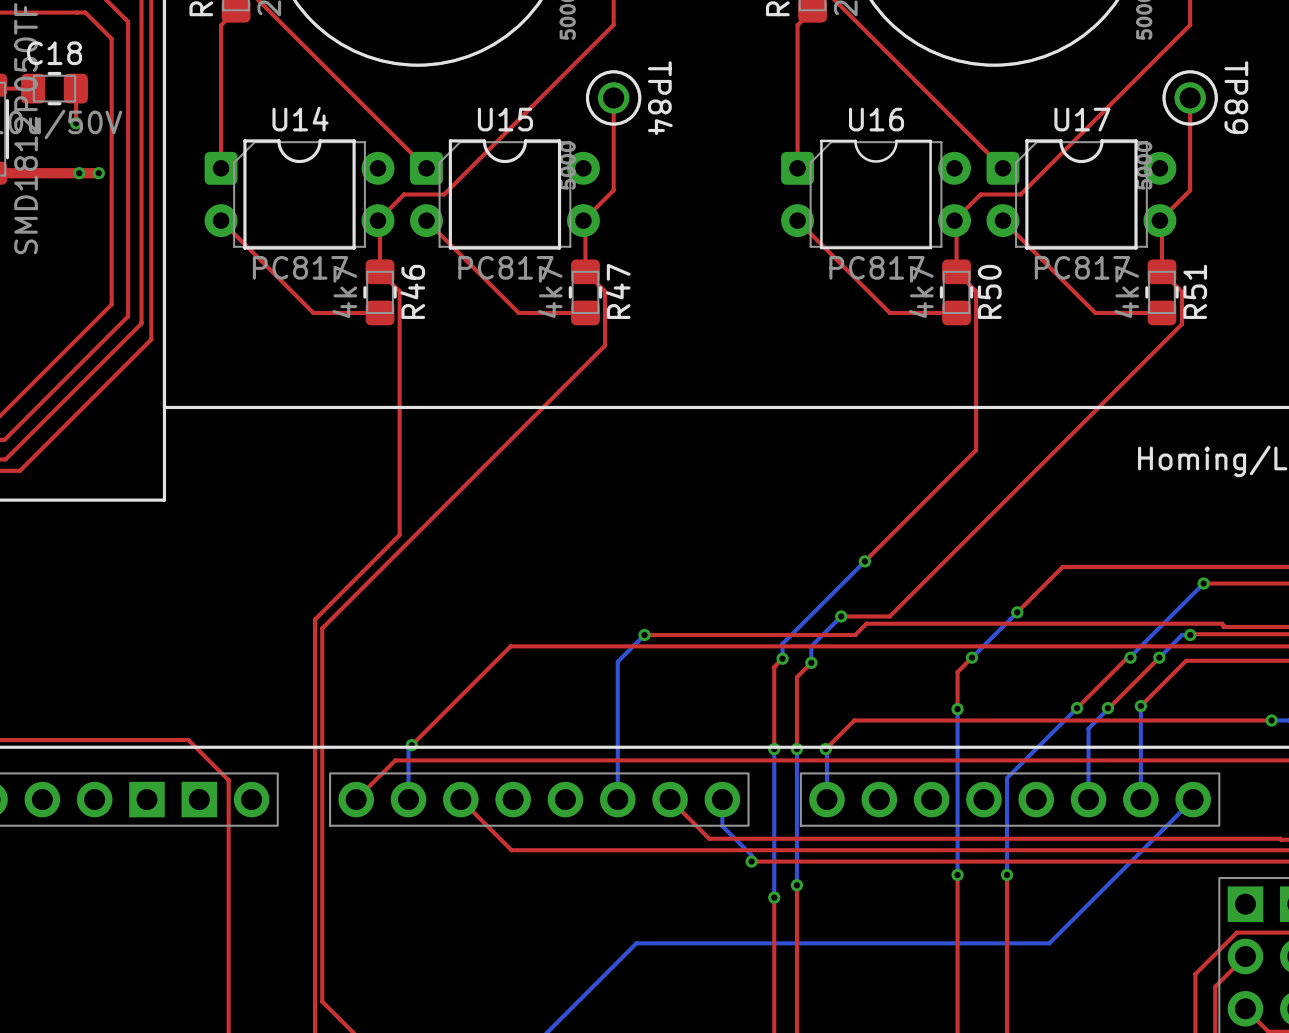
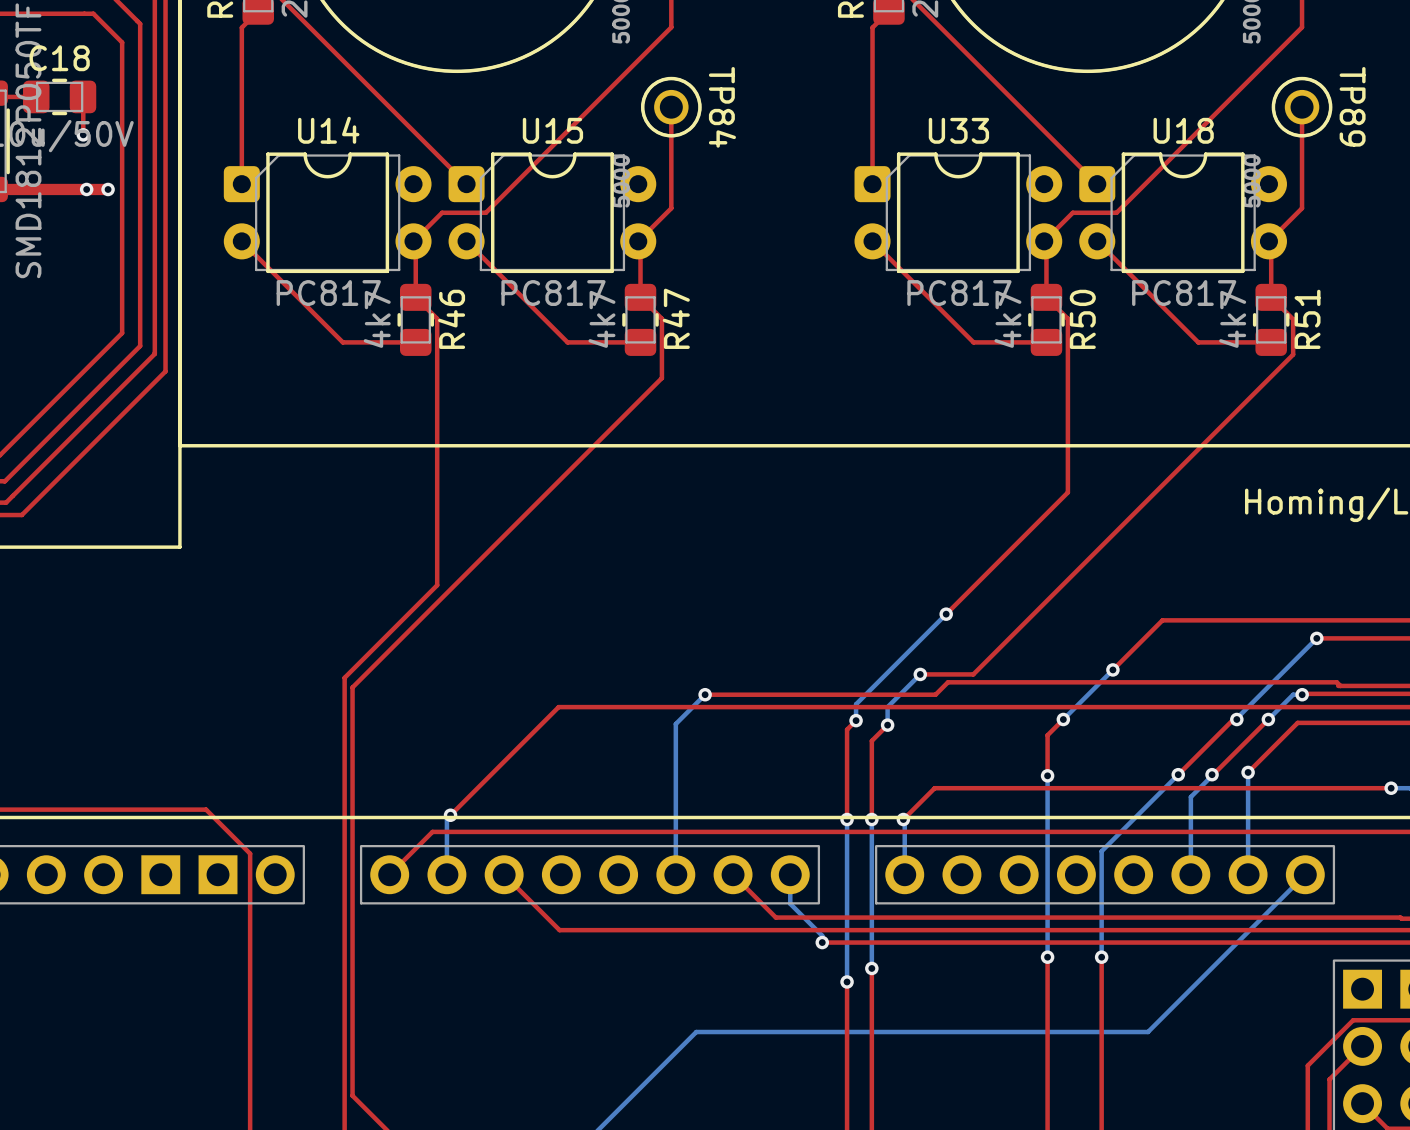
U17 name: U17 (1082, 119) -> U18 (1183, 130)
U16: PC817 (876, 194) -> none
U33: none -> PC817 (958, 212)

